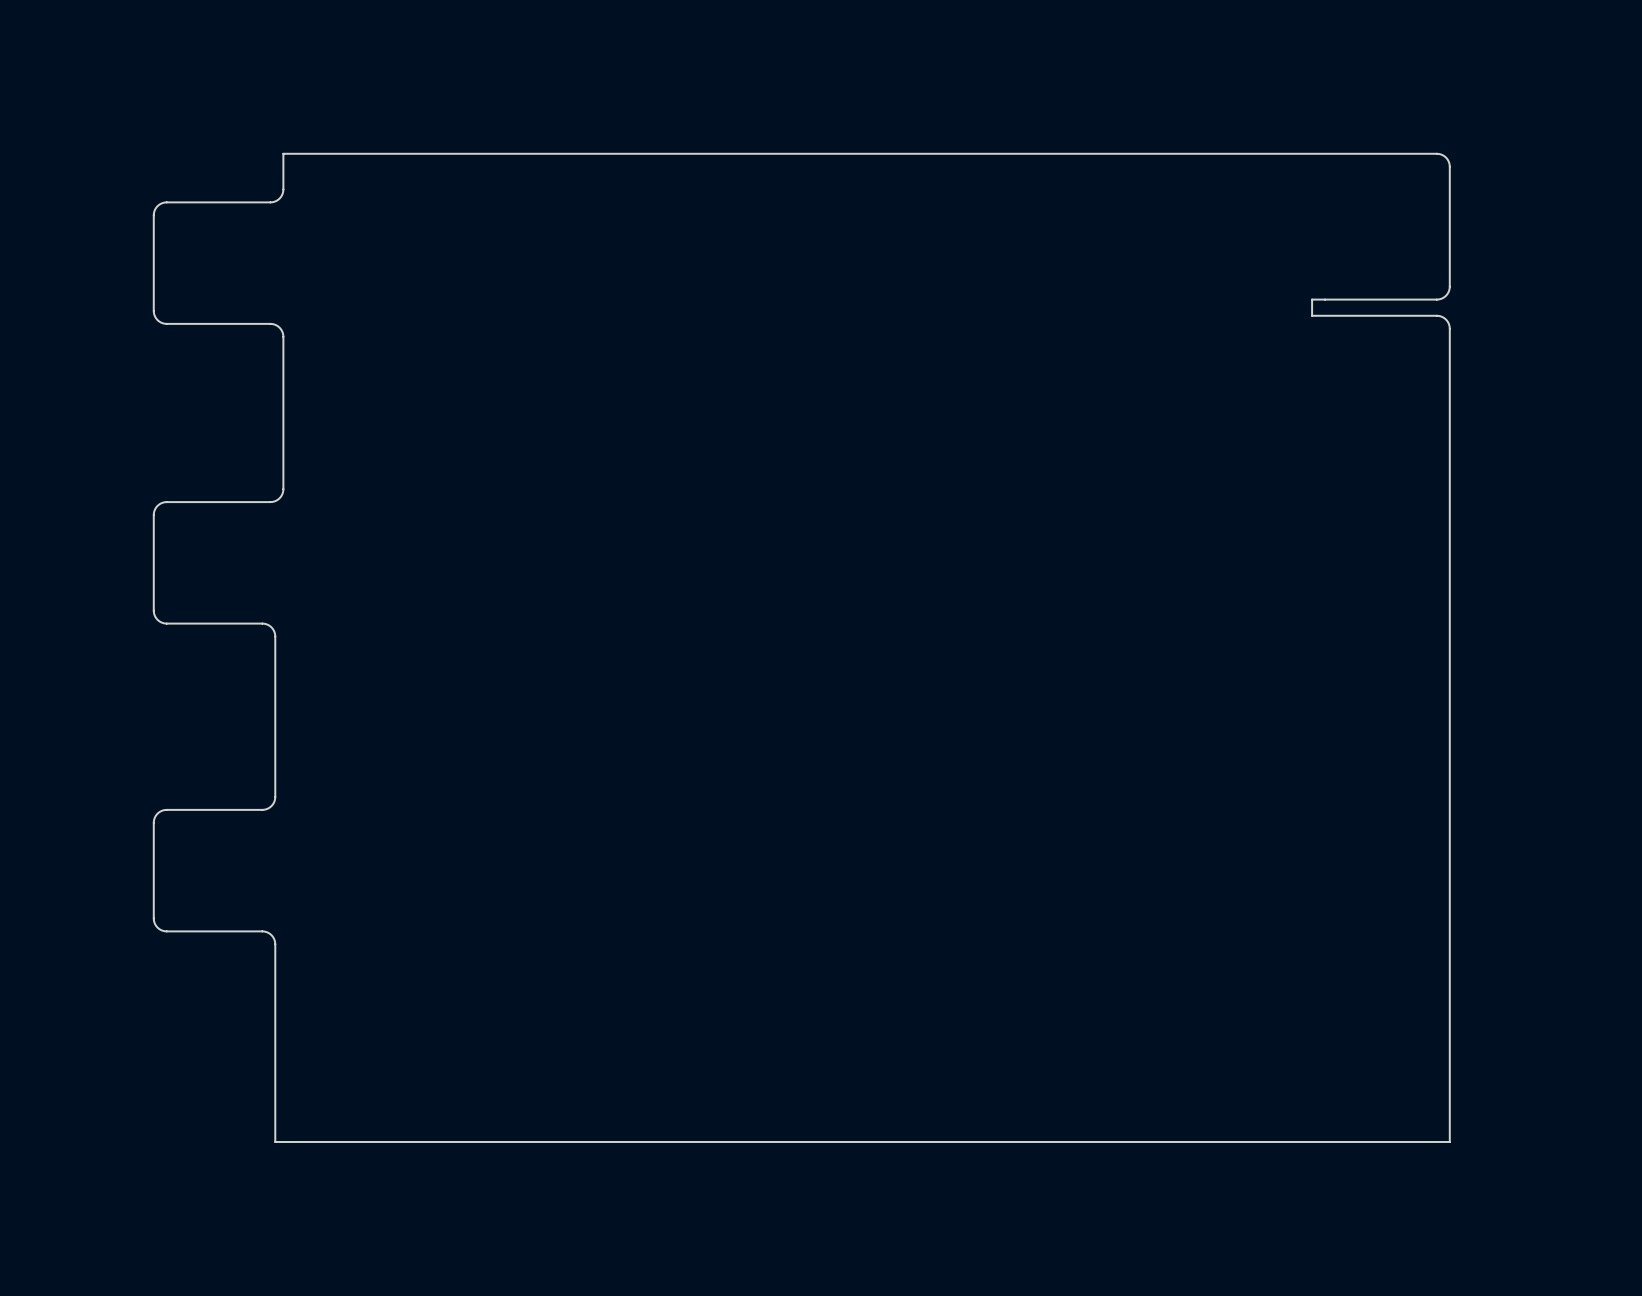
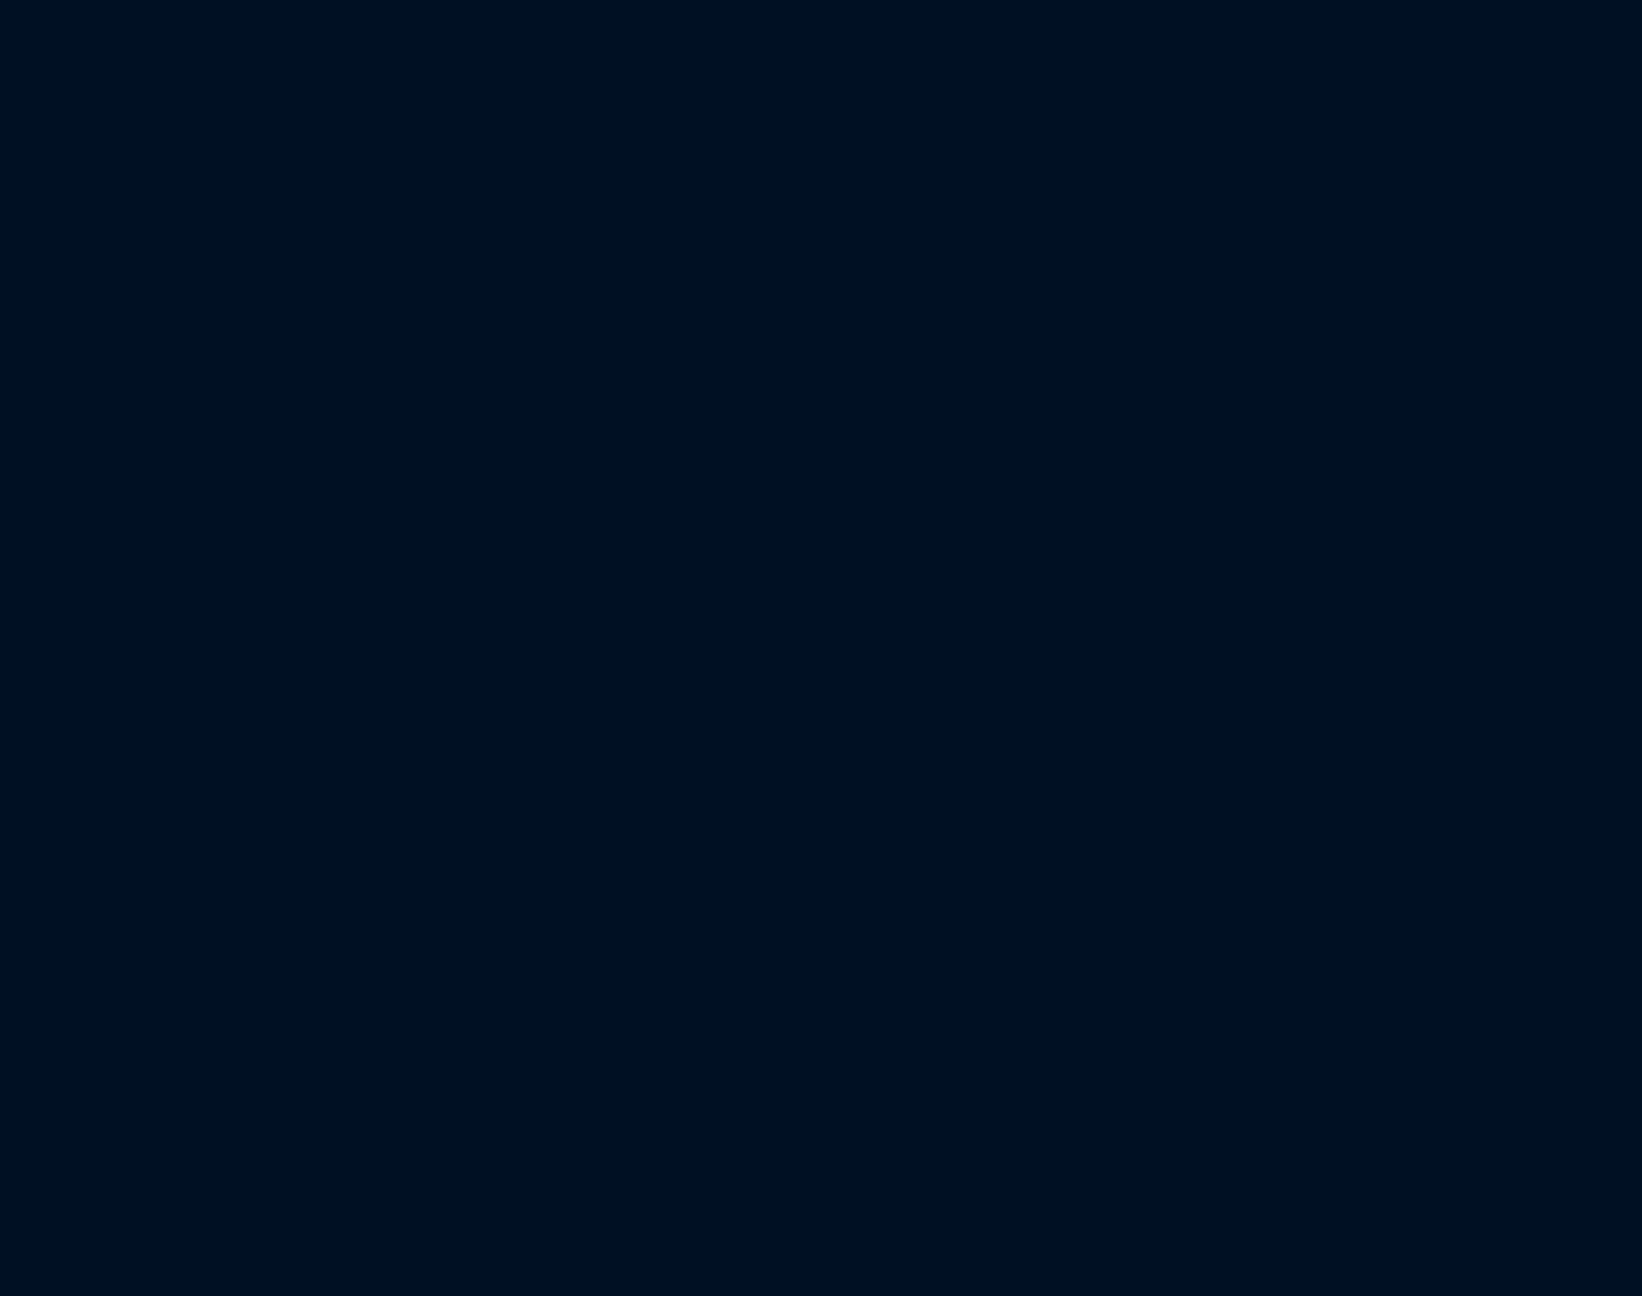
board edge: (1436, 153) (283, 153) (283, 192) (279, 198) (274, 201) (166, 202) (158, 205) (153, 215) (153, 310) (157, 320) (166, 323) (271, 323) (279, 327) (283, 335) (283, 489) (280, 497) (270, 502) (165, 502) (157, 505) (153, 515) (153, 610) (157, 619) (166, 623) (263, 623) (271, 627) (274, 633) (274, 802) (270, 807) (263, 809) (166, 809) (157, 813) (153, 822) (153, 918) (156, 926) (165, 931) (263, 931) (270, 934) (274, 938) (275, 1141) (1449, 1141) (1449, 327) (1445, 319) (1438, 315) (1312, 315) (1312, 299) (1436, 299) (1446, 294) (1449, 286) (1449, 165) (1445, 157) (1436, 153) -> none

